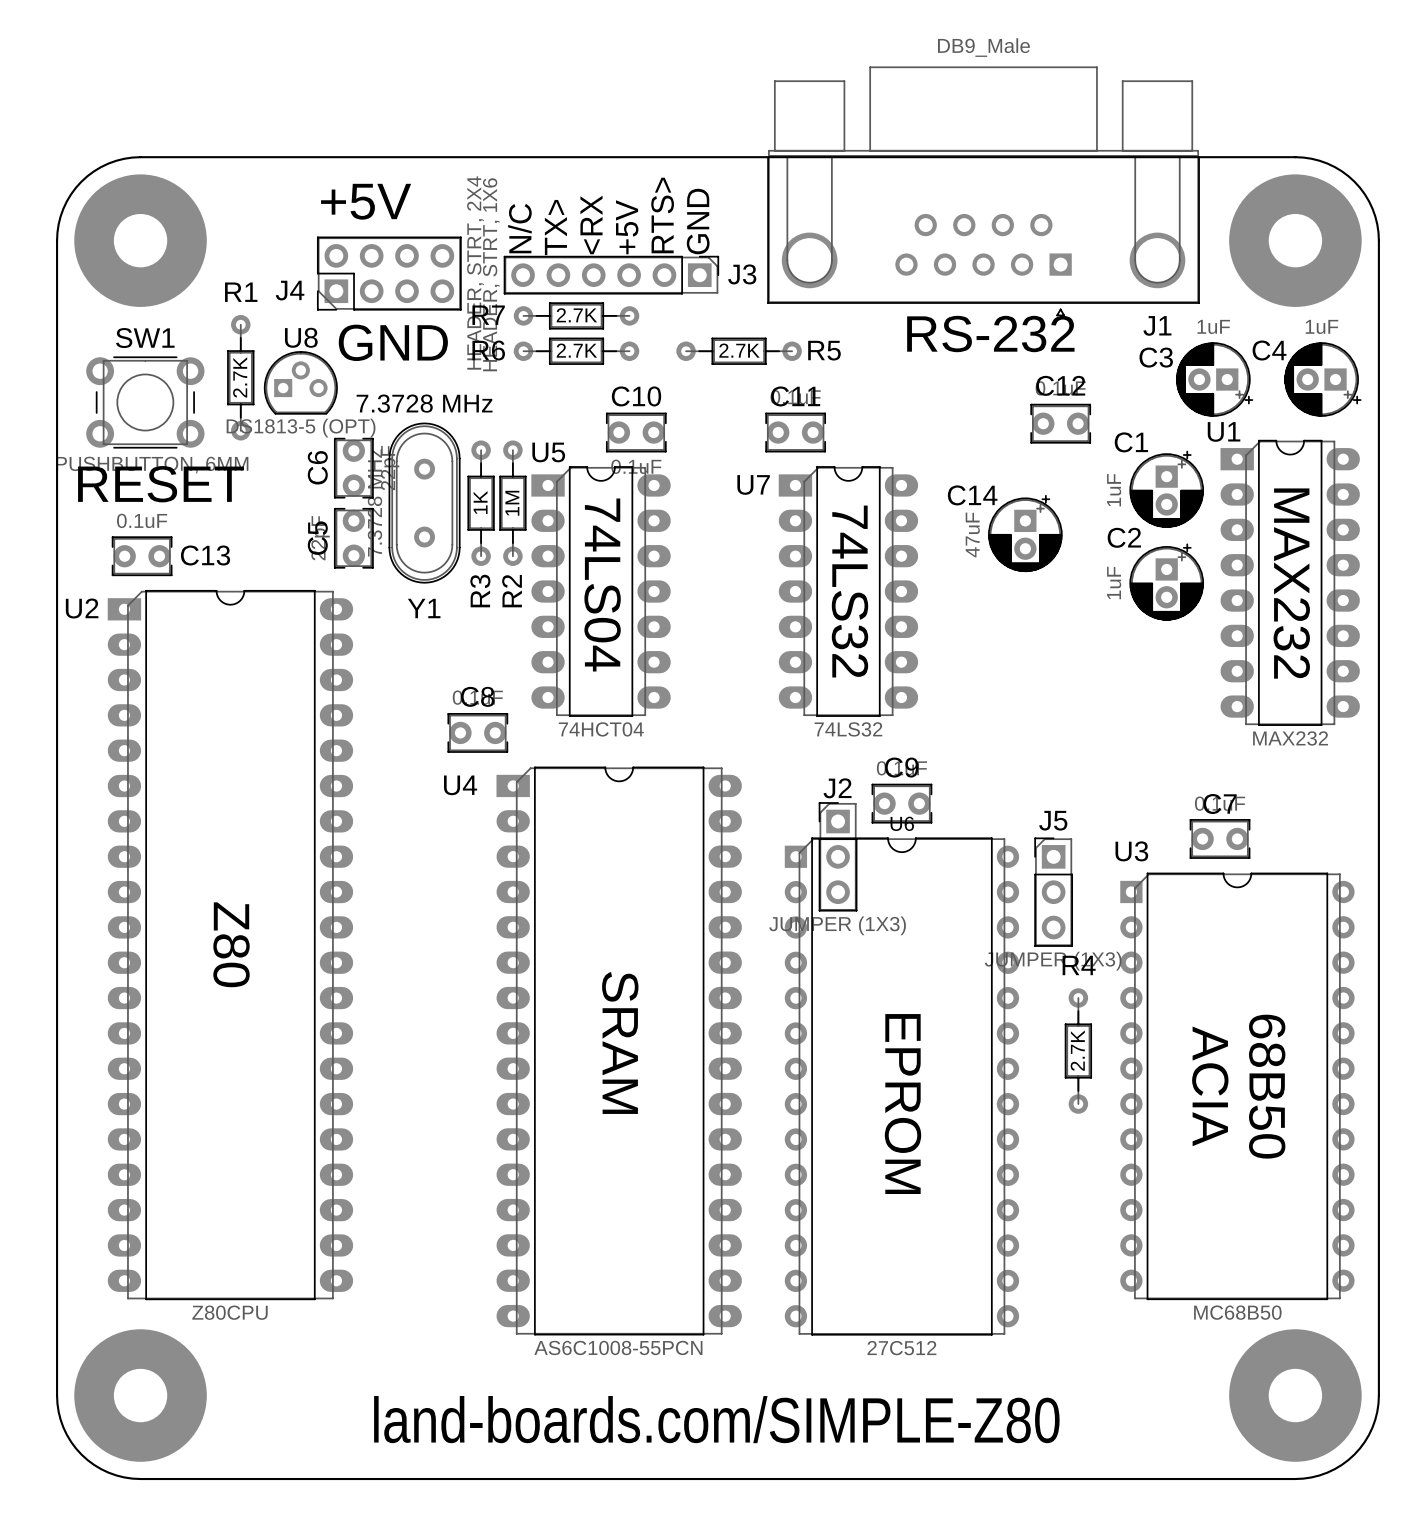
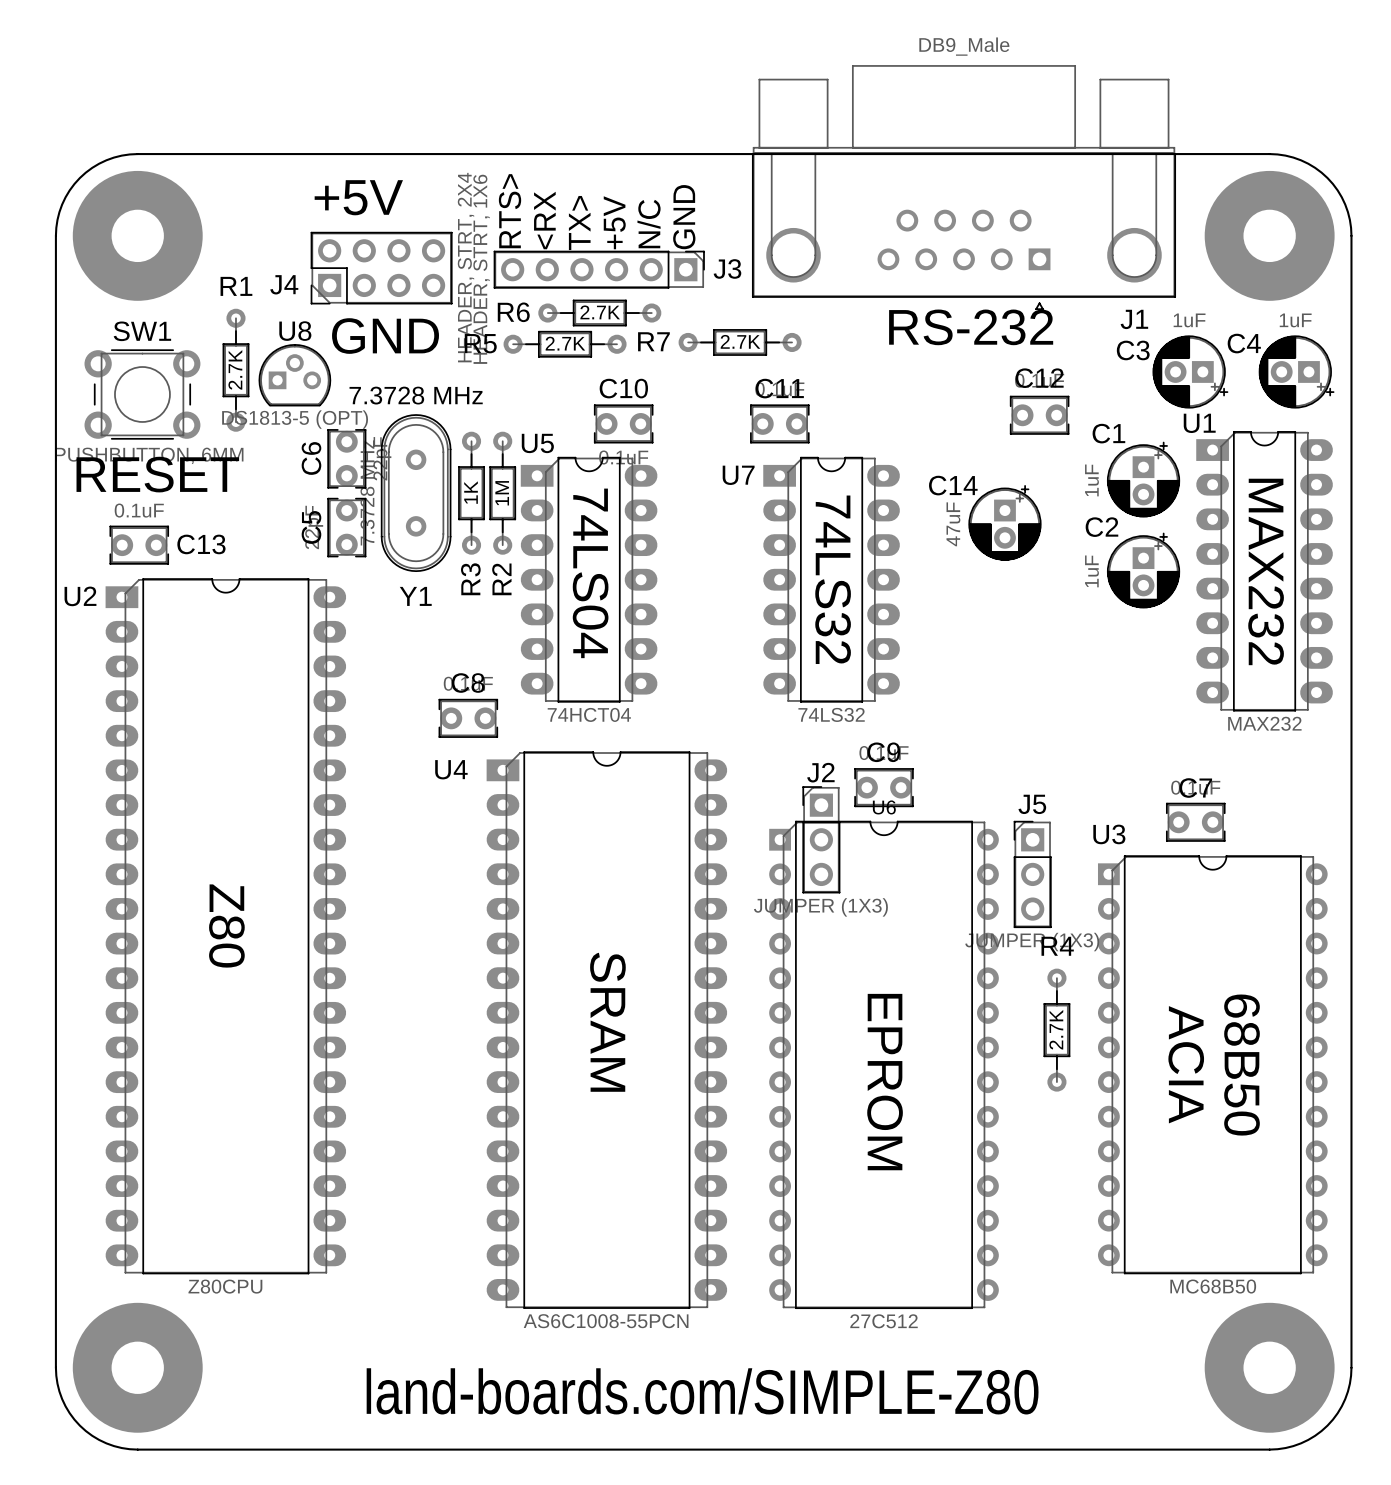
text: RTS> (662, 215) -> N/C (649, 224)
text: <RX (591, 224) -> TX> (579, 223)
text: TX> (555, 227) -> <RX (544, 220)
text: N/C (519, 228) -> RTS> (510, 211)
R7 position: (576, 315) -> (740, 342)
R6: none -> 2.7K (599, 313)
R6 name: R6 (488, 350) -> R5 (480, 343)
R5: 2.7K (739, 351) -> none

